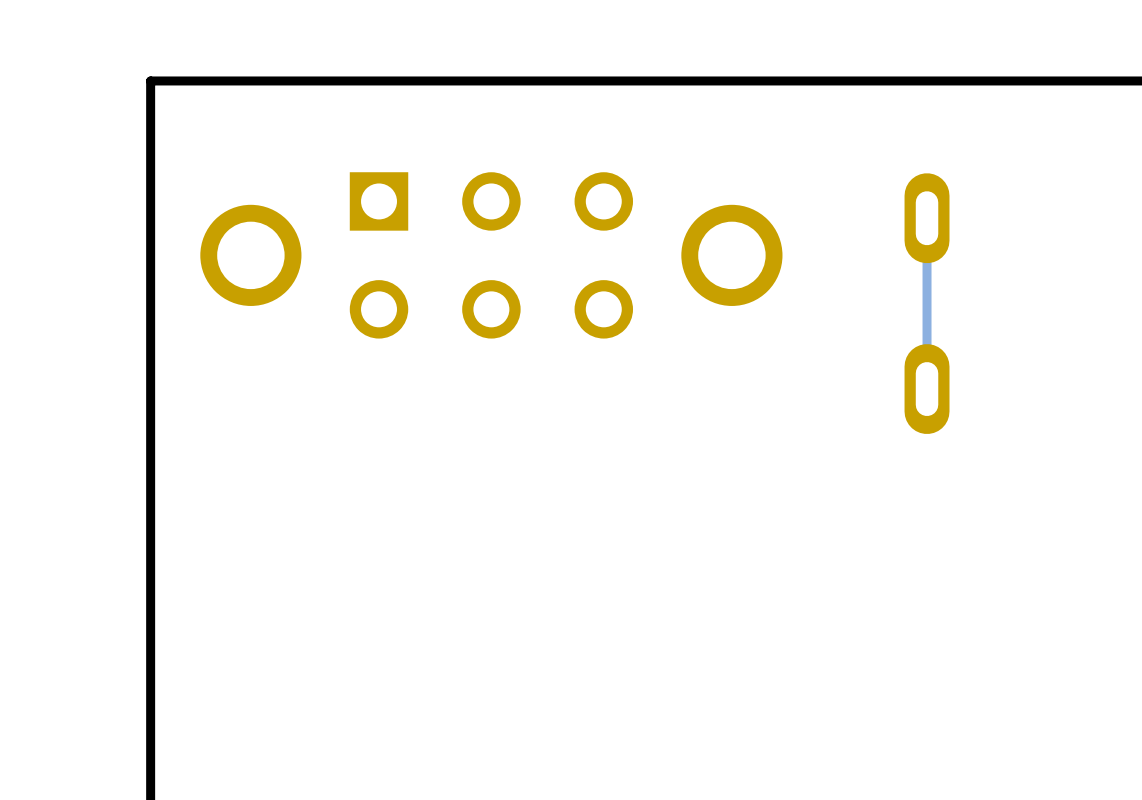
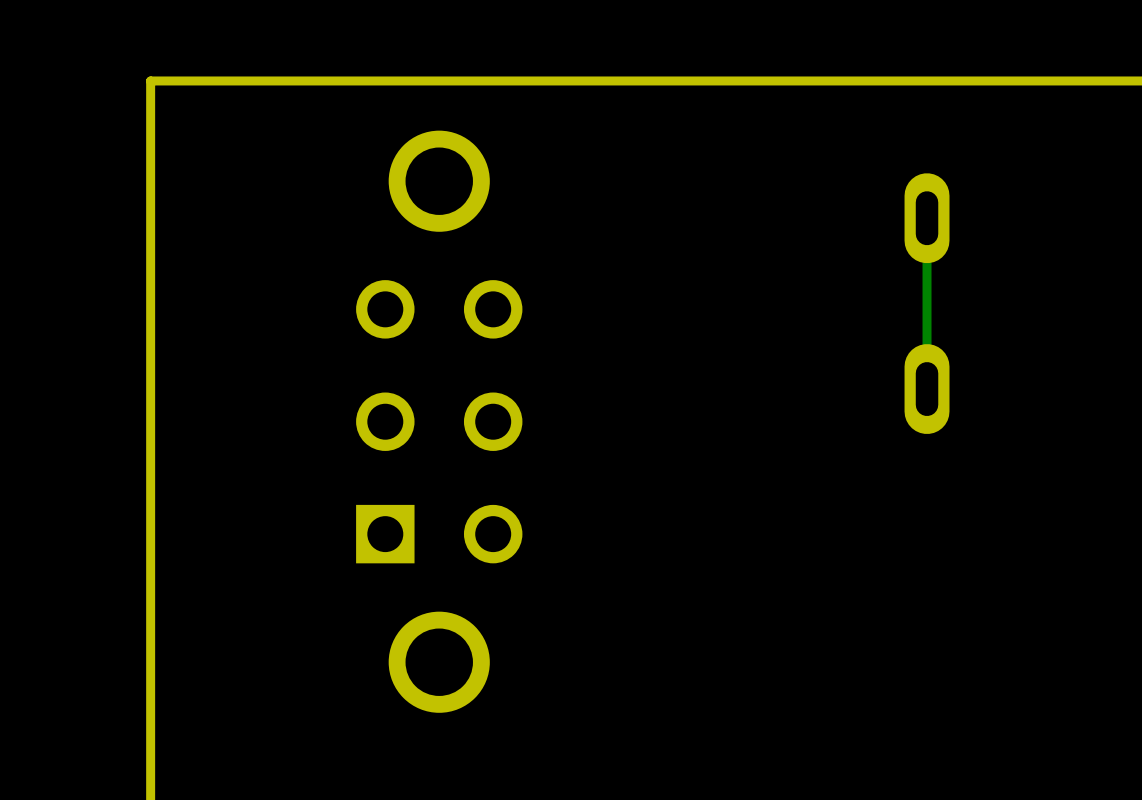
part rotation: 0° (491, 255) -> 90° counterclockwise (439, 421)

